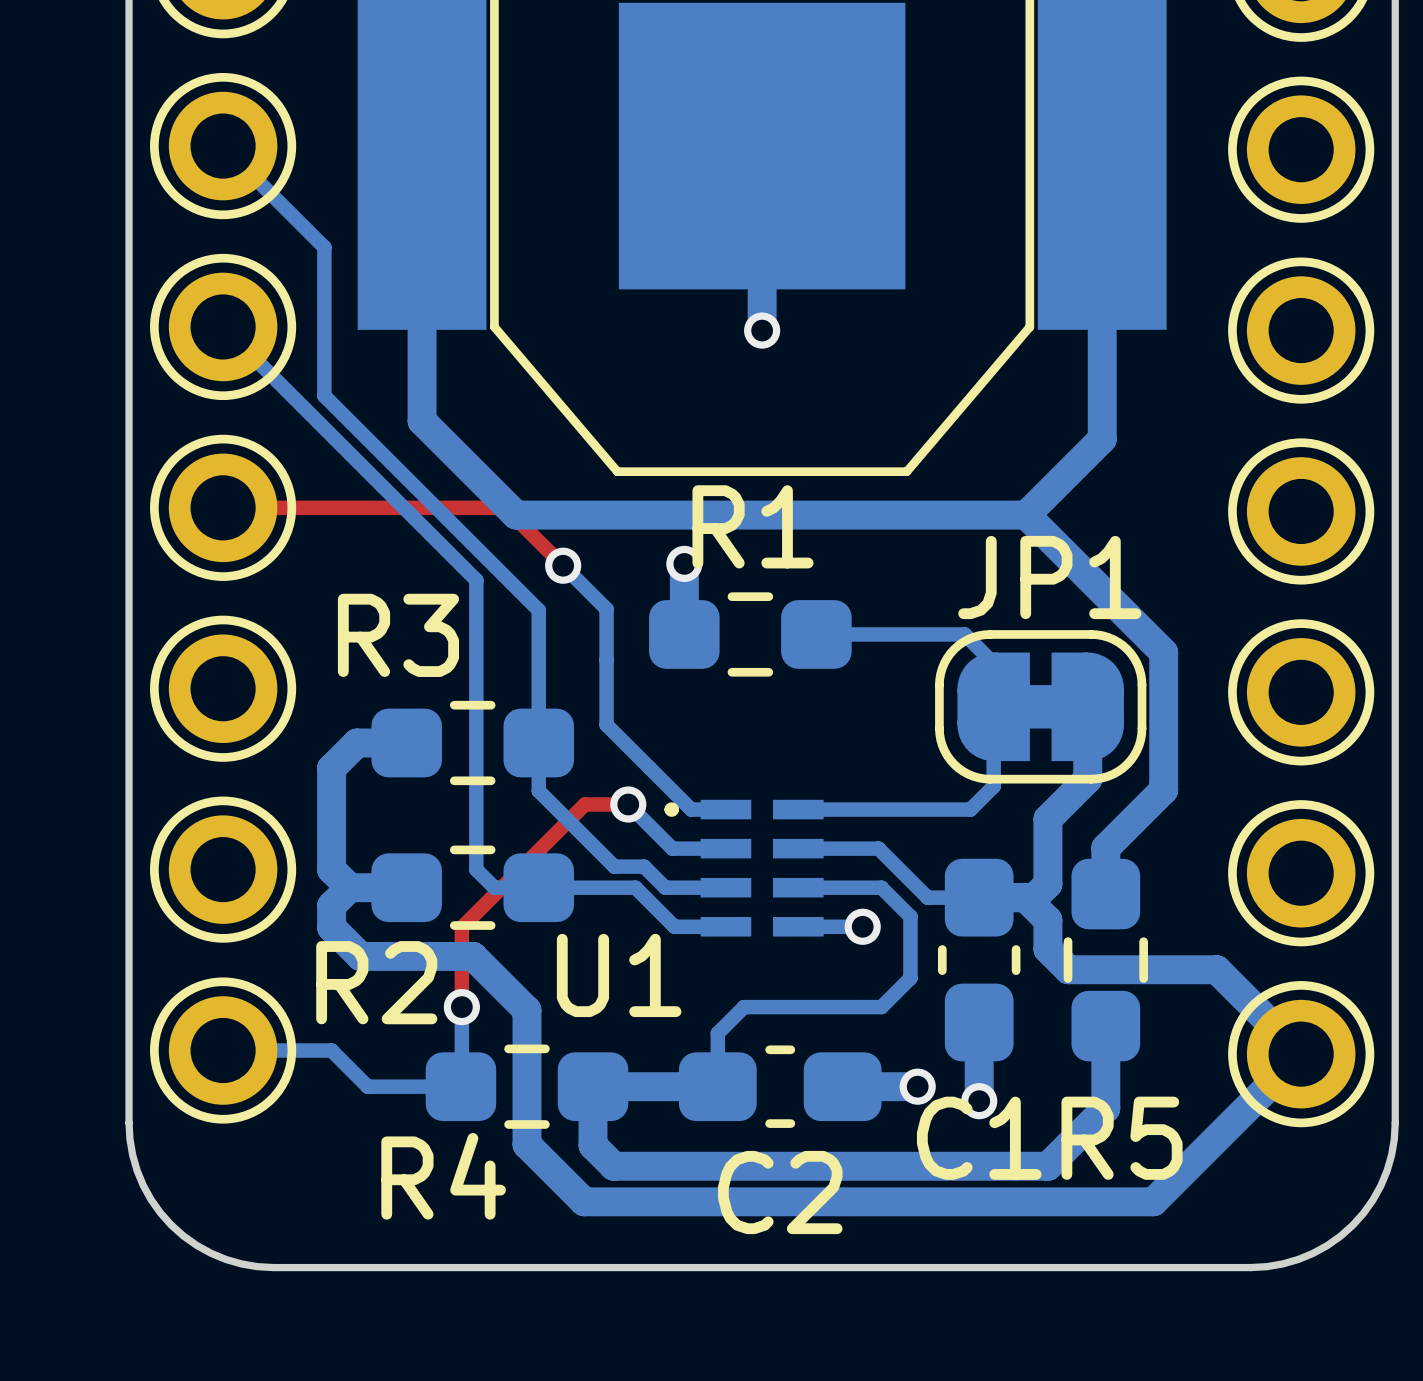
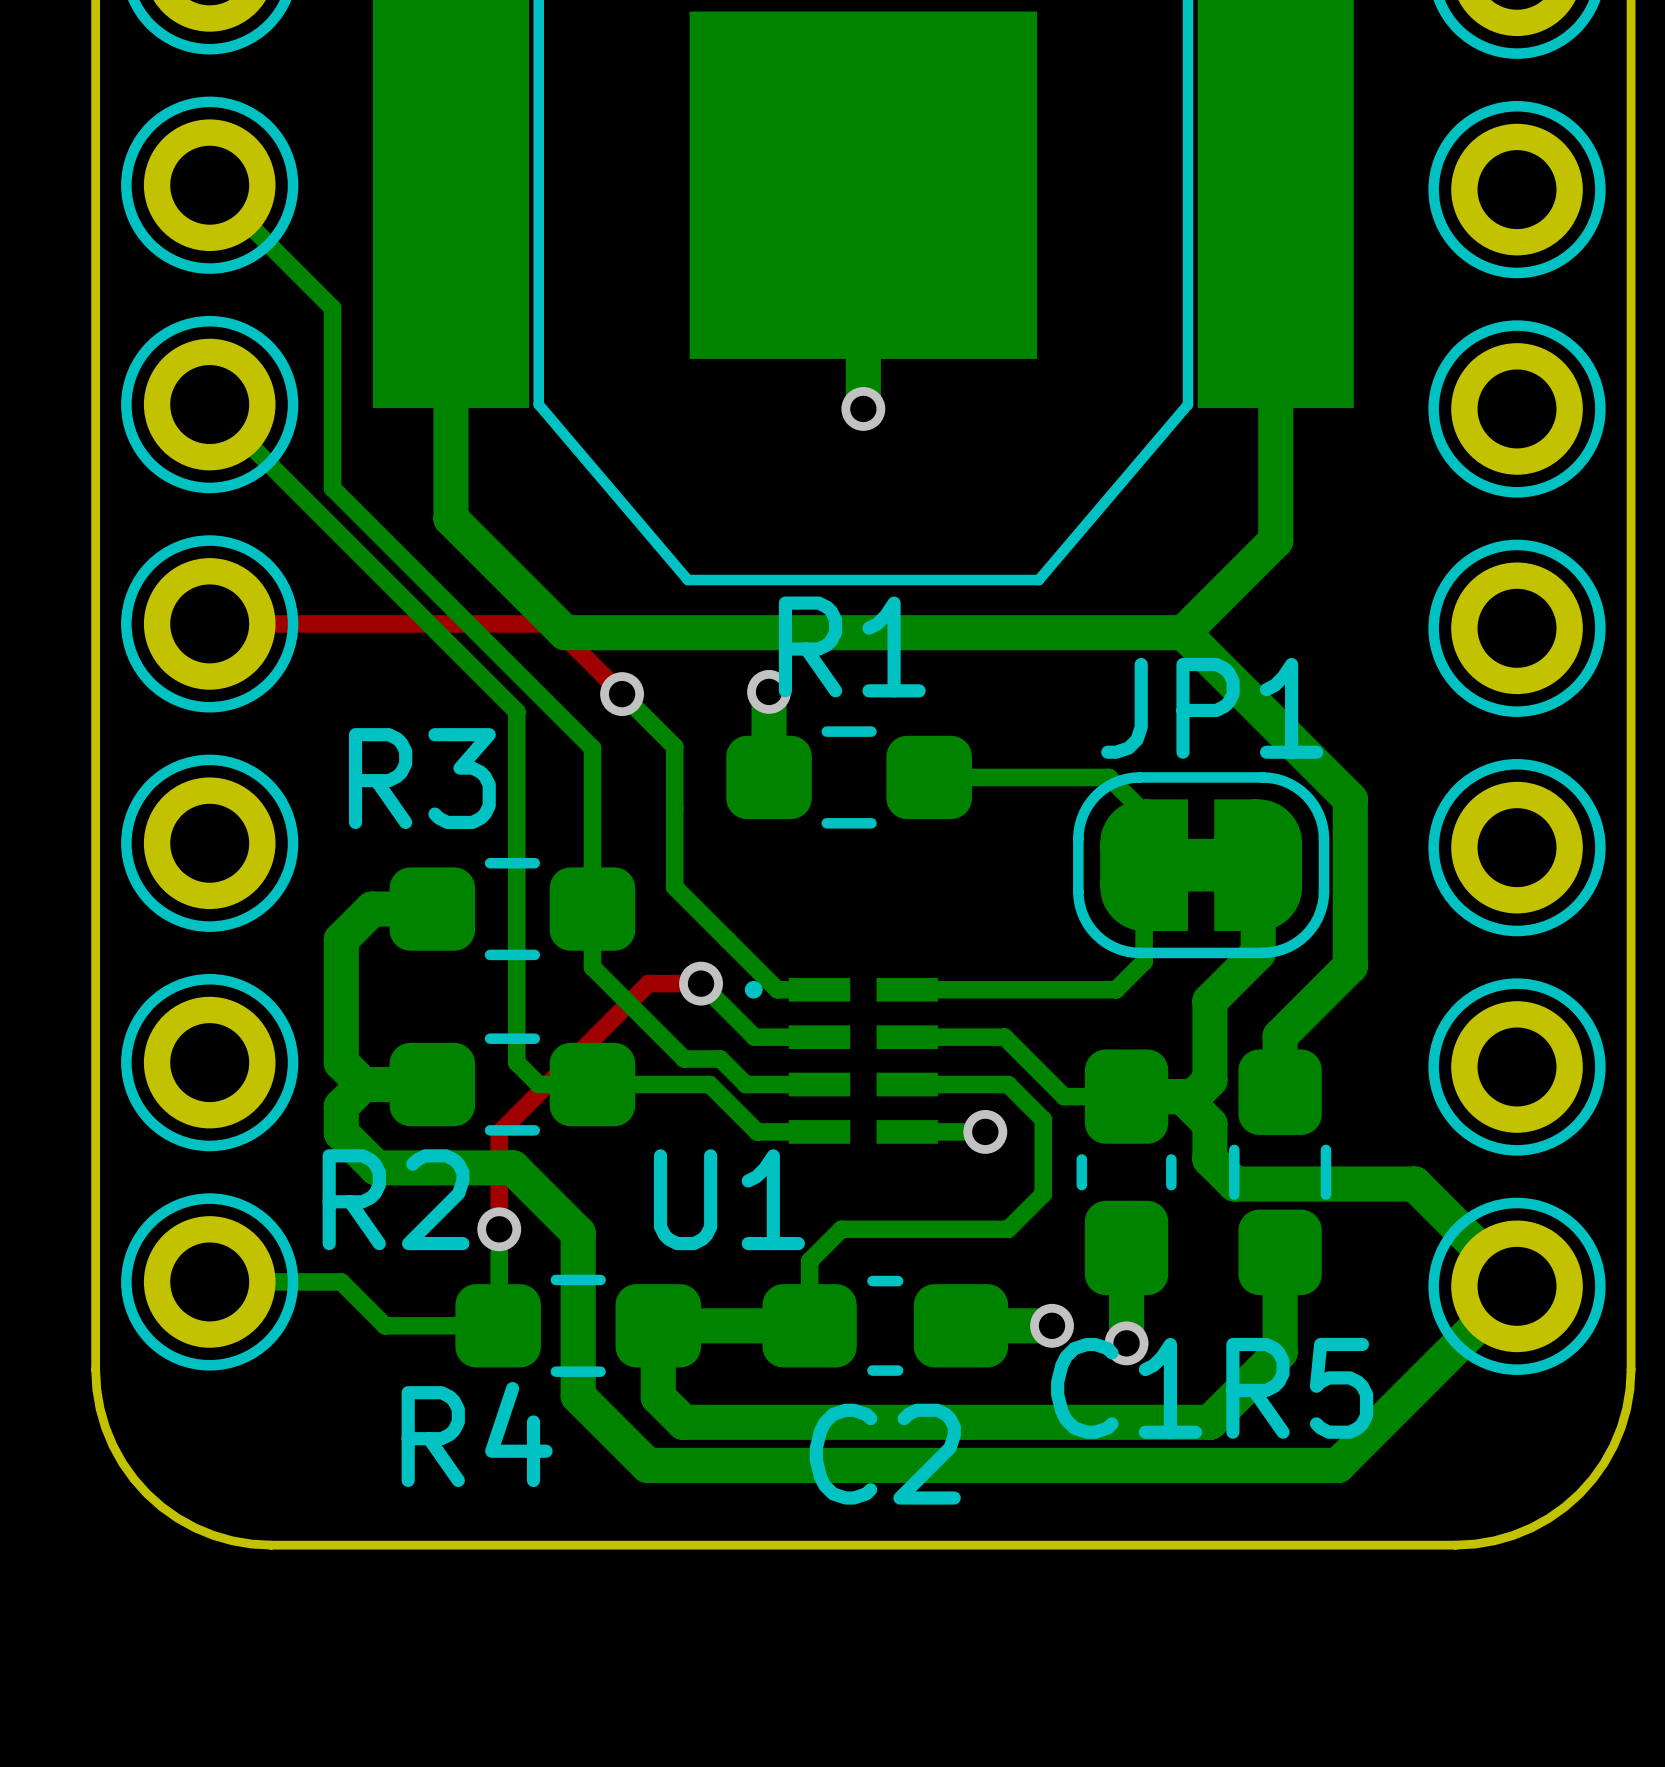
U1 name position: U1 (619, 975) -> U1 (729, 1199)

